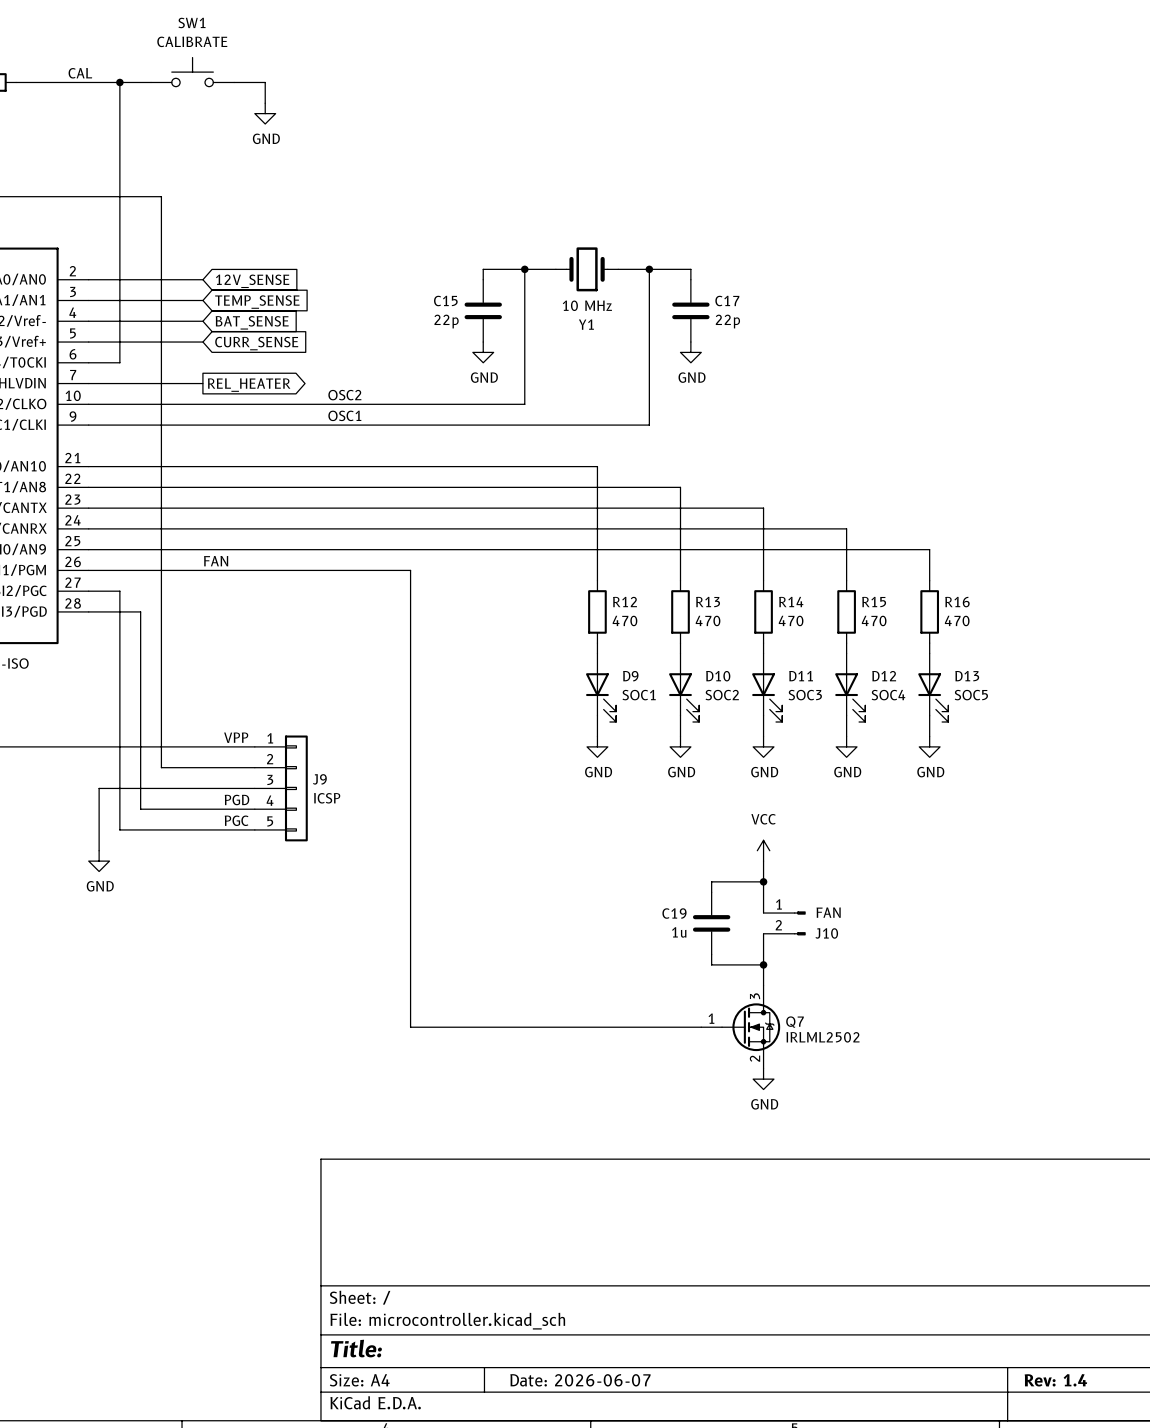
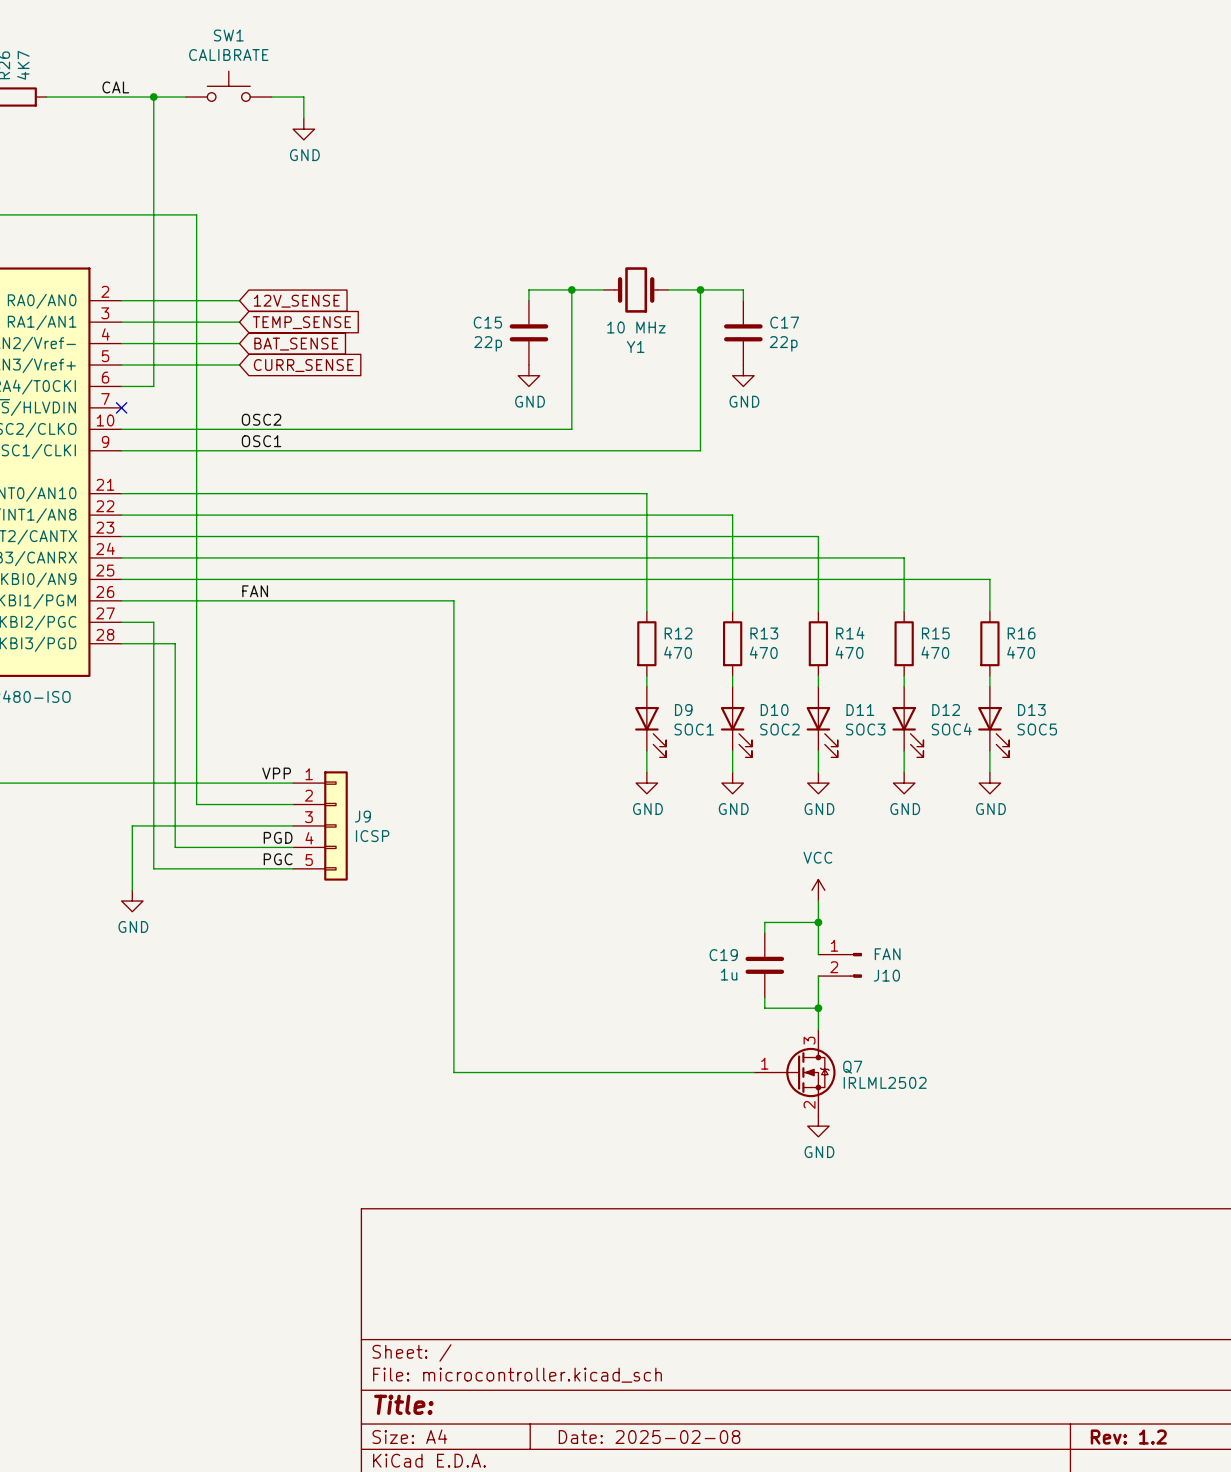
wire: (88, 383) (202, 383) -> none
no-connect mark: none -> (121, 407)
global label: REL_HEATER (249, 385) -> none
label position: OSC2 (344, 395) -> OSC2 (261, 419)
label position: OSC1 (344, 415) -> OSC1 (261, 441)
title block: Date: 2026-06-07 (580, 1380) -> Date: 2025-02-08 (649, 1437)
title block: Rev: 1.4 (1055, 1380) -> Rev: 1.2 (1128, 1437)

